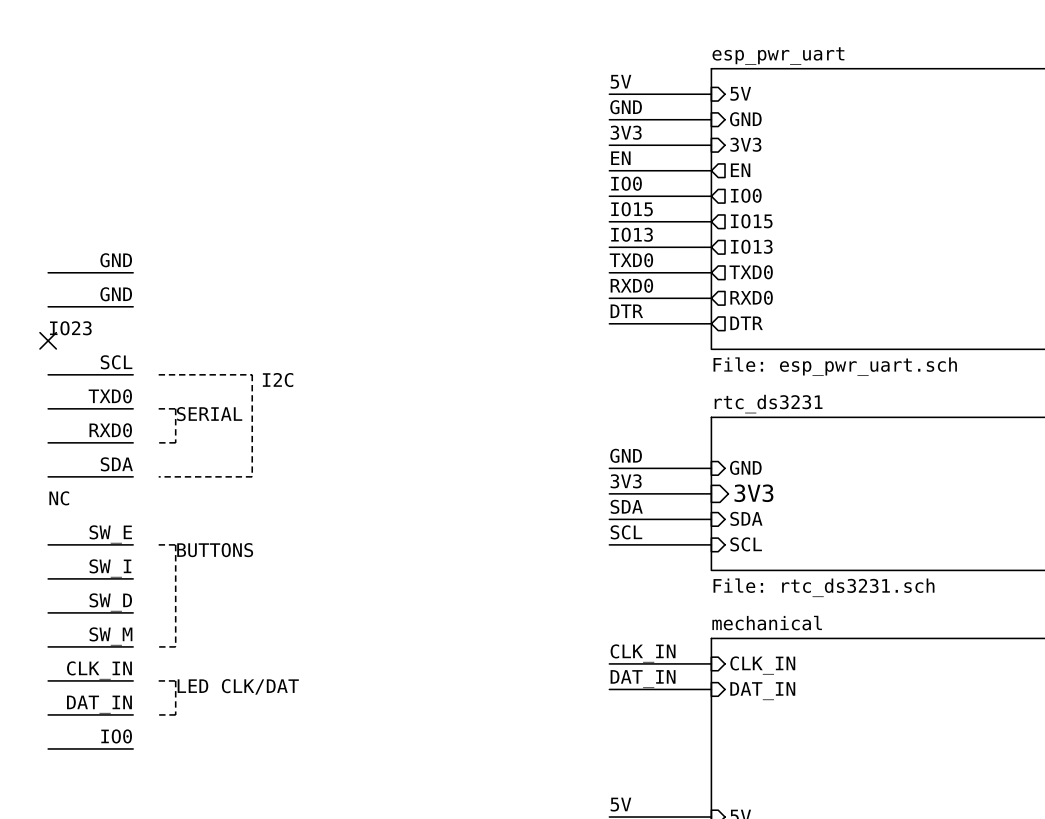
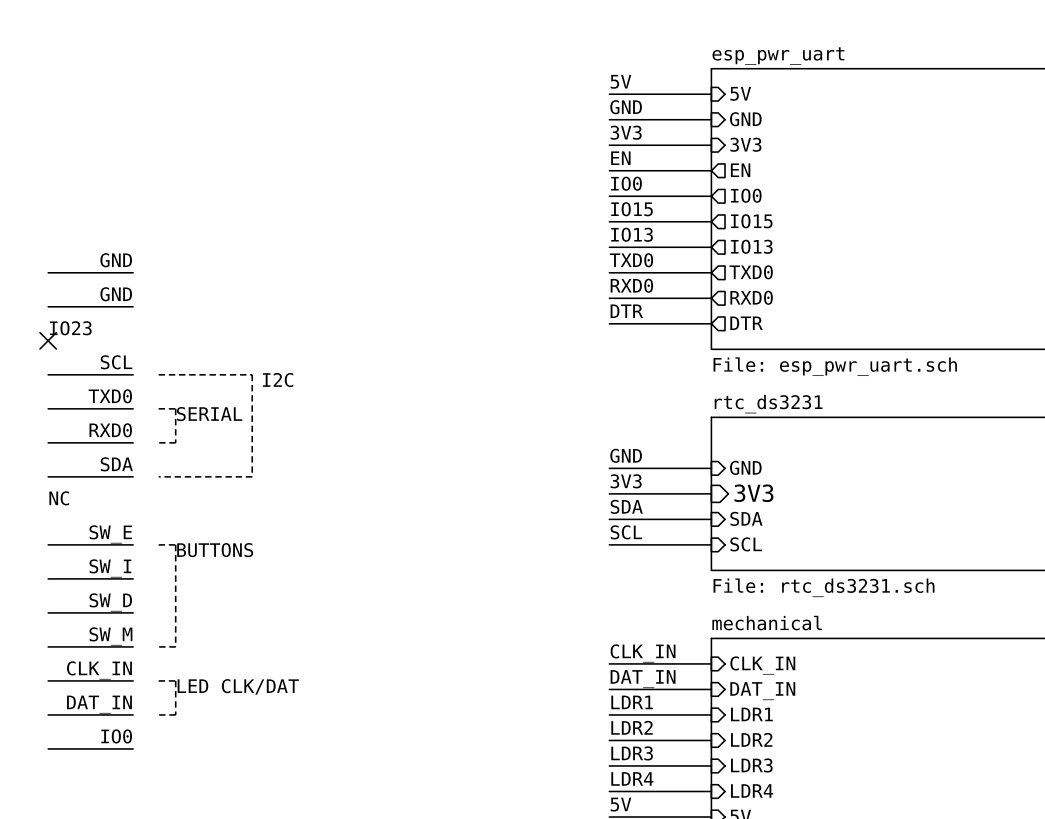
label: none -> LDR1 (632, 702)
wire: none -> (609, 714) (711, 714)
sheet pin: none -> LDR1 (751, 714)
label: none -> LDR2 (632, 727)
sheet pin: none -> LDR2 (751, 739)
wire: none -> (609, 740) (711, 740)
label: none -> LDR3 (632, 753)
wire: none -> (609, 765) (711, 765)
sheet pin: none -> LDR3 (751, 765)
label: none -> LDR4 (632, 778)
sheet pin: none -> LDR4 (752, 790)
wire: none -> (609, 791) (711, 791)

